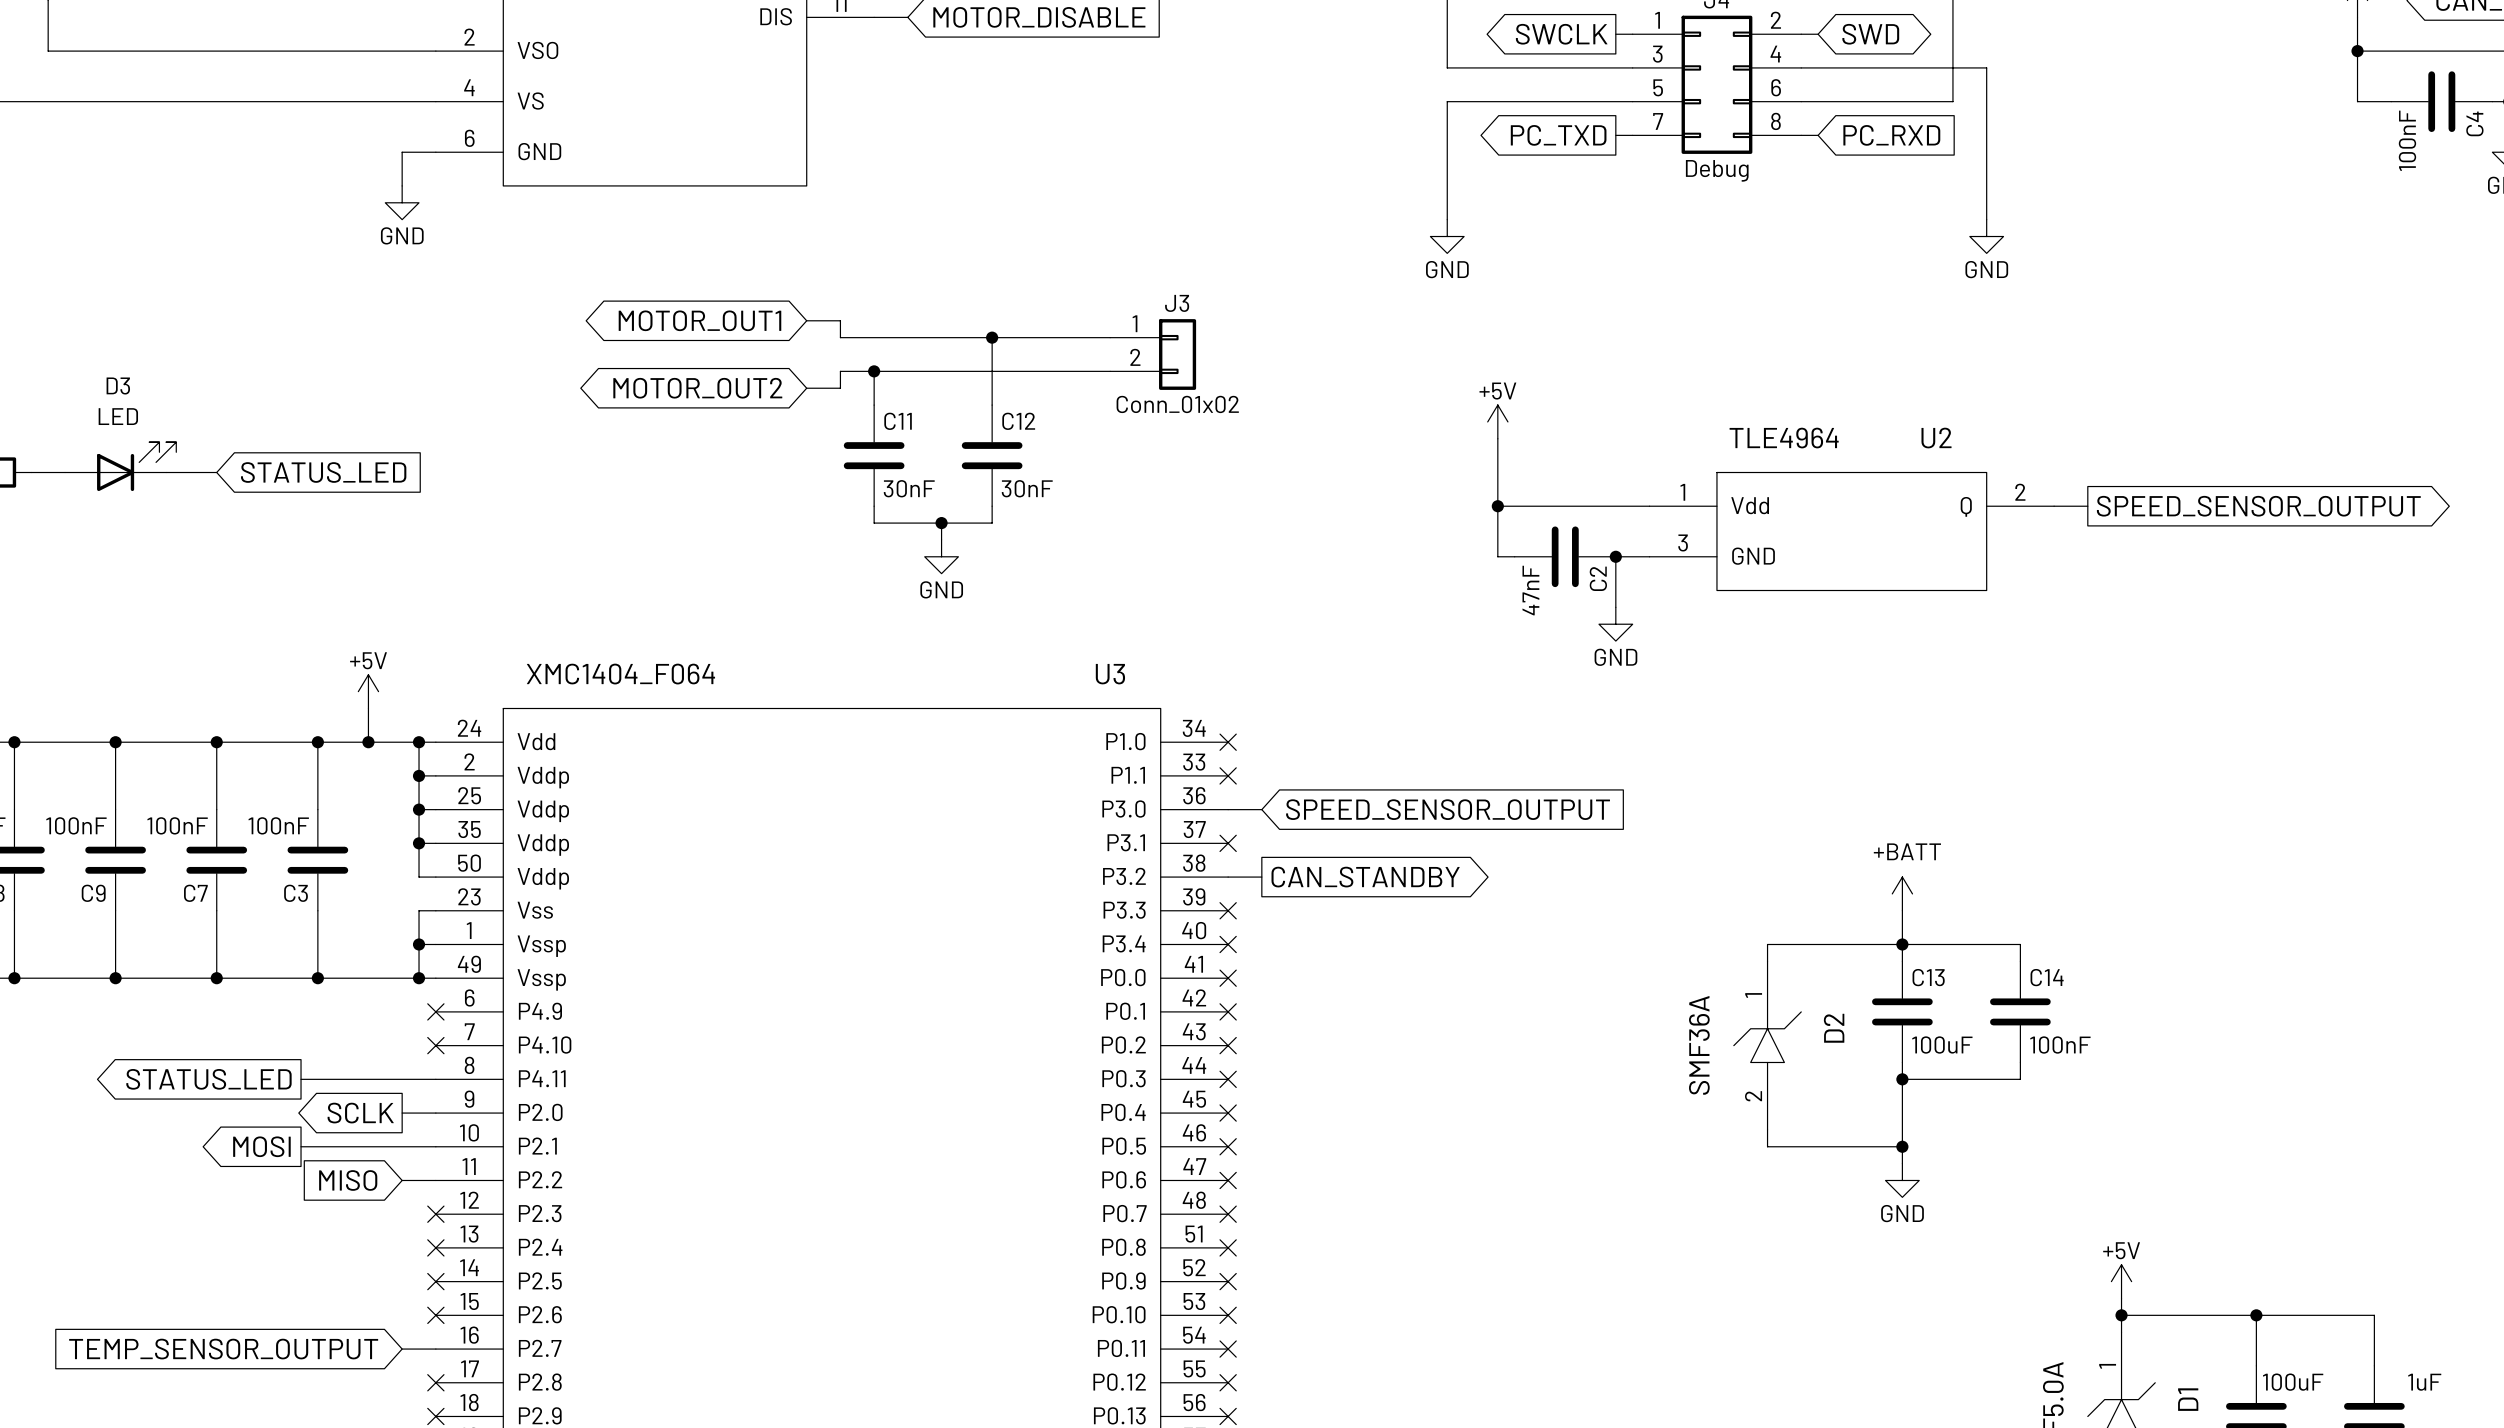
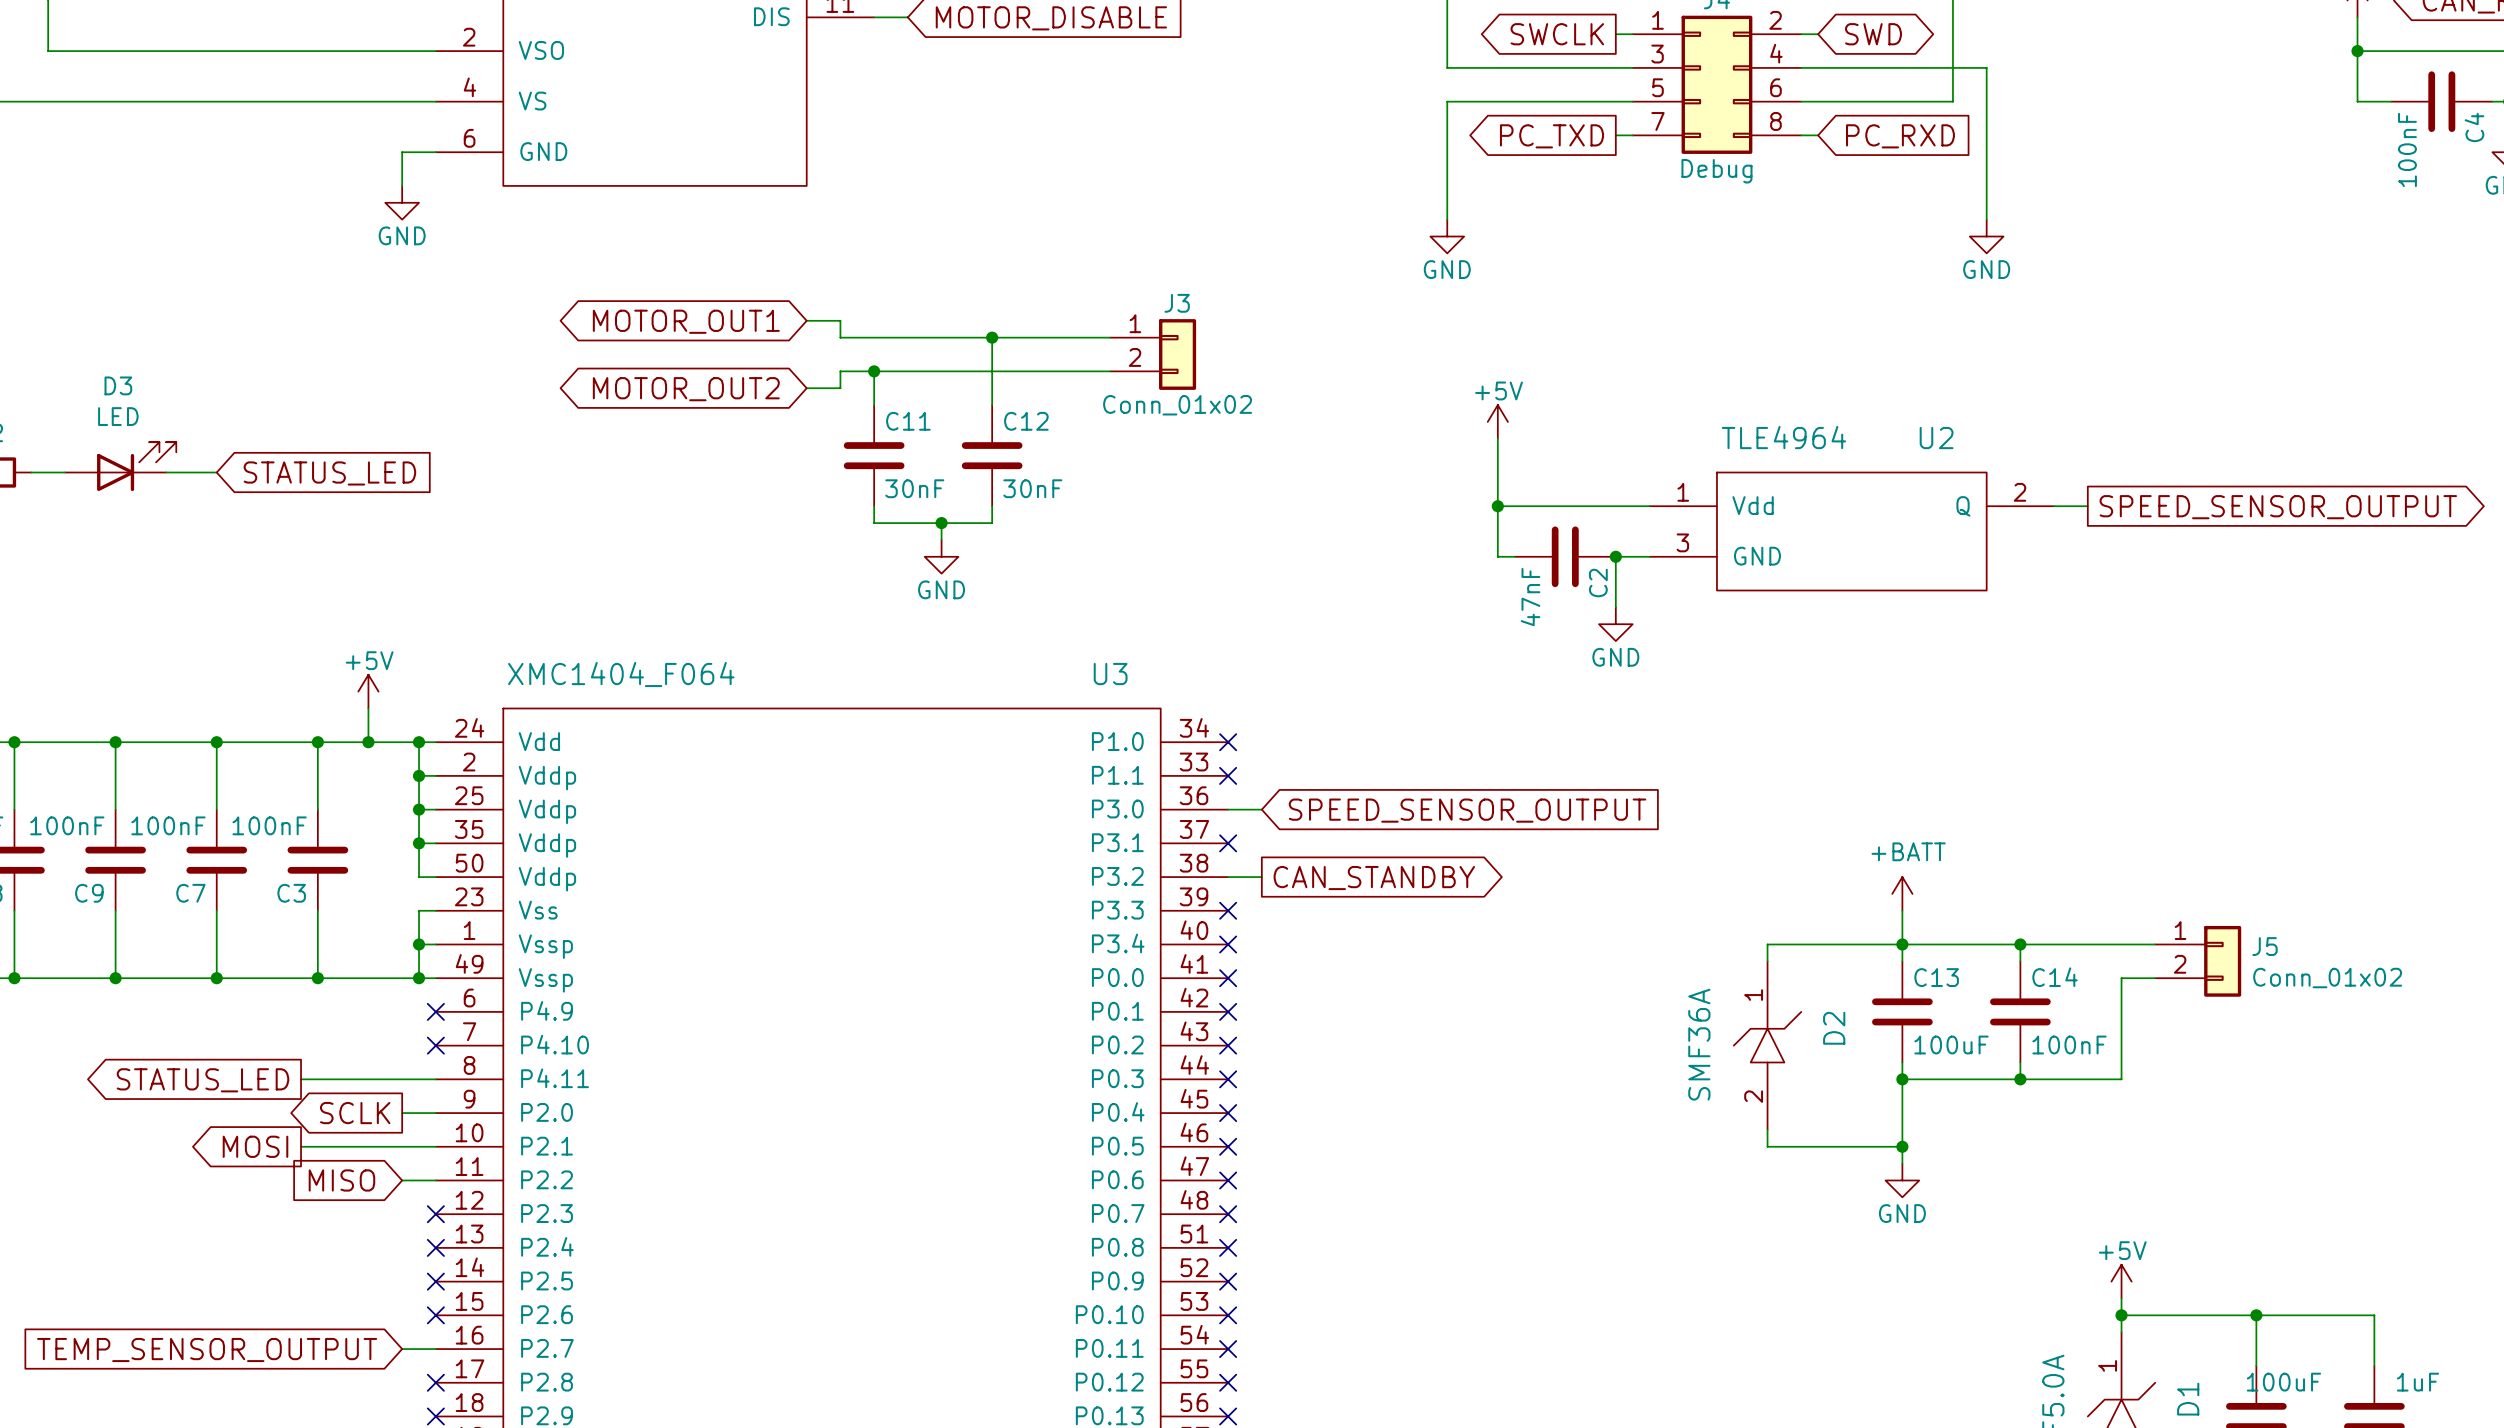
wire: none -> (2020, 944) (2155, 944)
junction: none -> (2020, 944)
J5: none -> Conn_01x02 (2198, 961)
wire: none -> (2155, 978) (2121, 978) (2121, 1079) (2020, 1079)
junction: none -> (2020, 1079)

